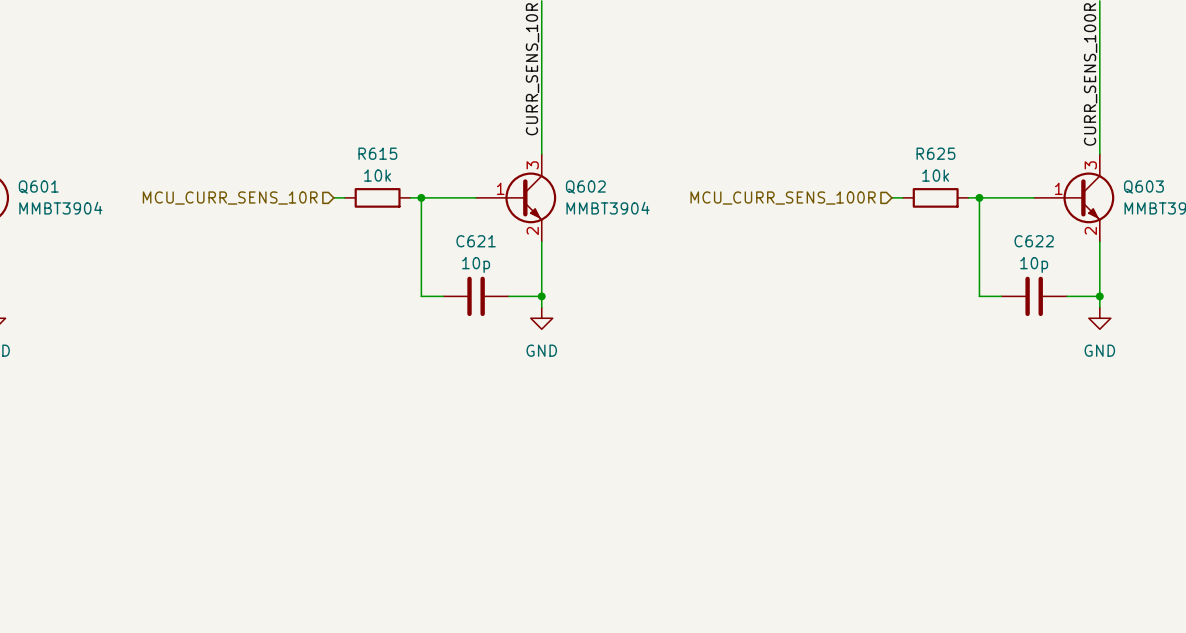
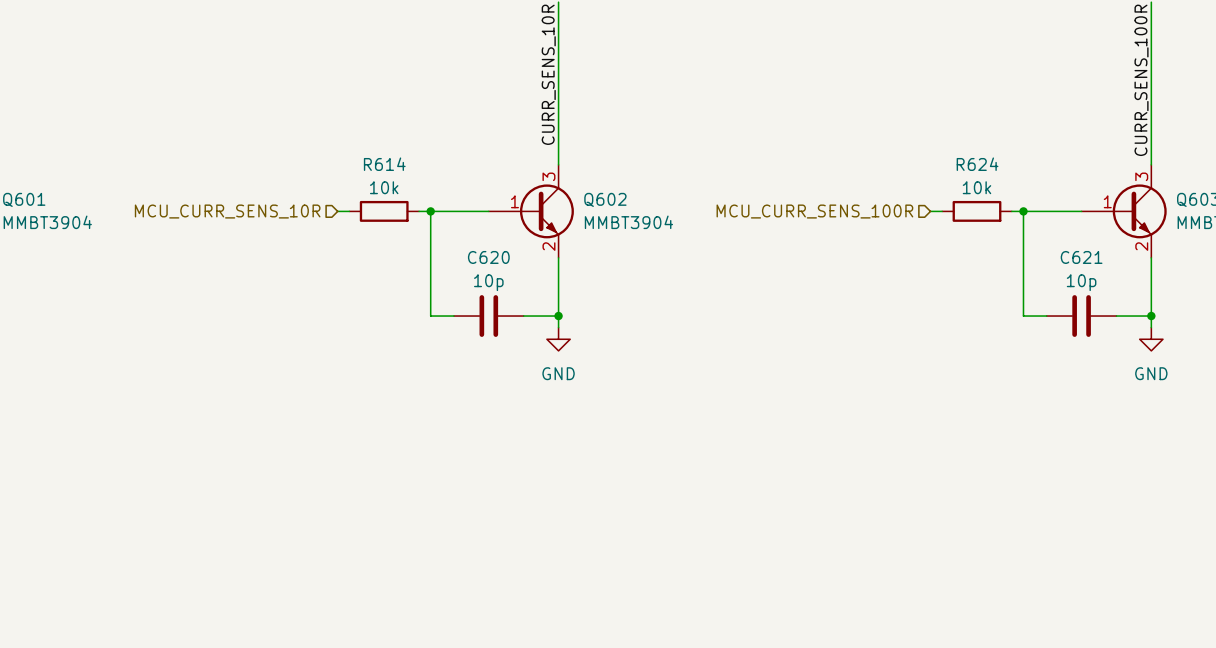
R615 name: R615 (377, 153) -> R614 (384, 164)
R625 name: R625 (935, 153) -> R624 (977, 164)
C621 name: C621 (476, 241) -> C620 (488, 257)
C622 name: C622 (1034, 241) -> C621 (1081, 257)

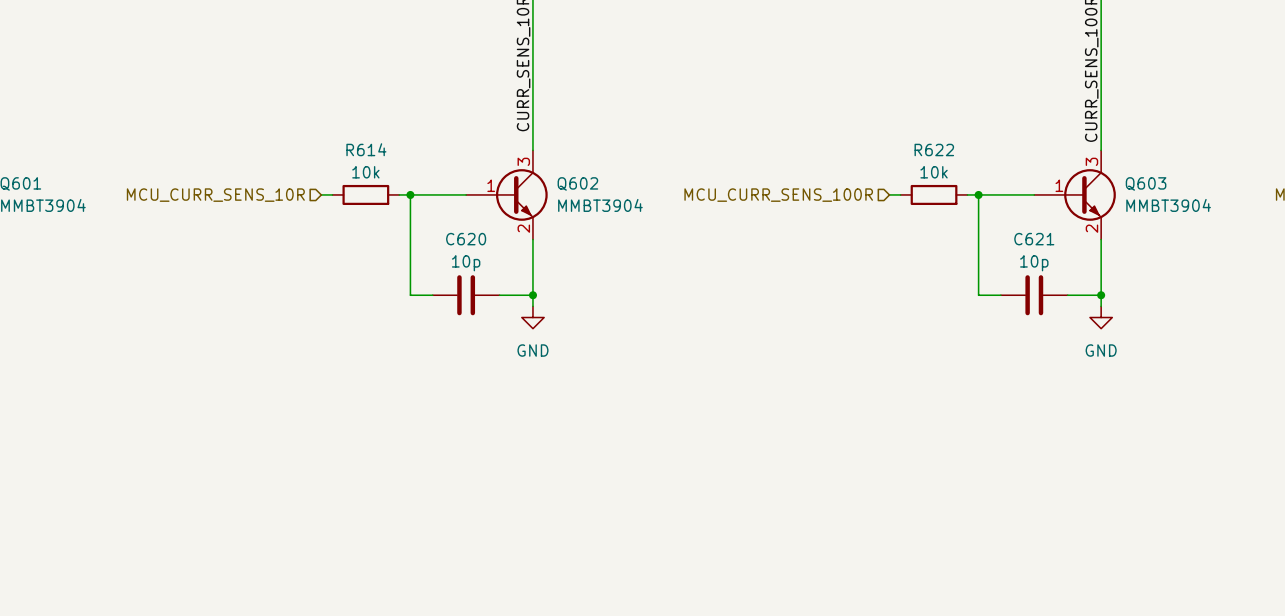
R624 name: R624 (977, 164) -> R622 (934, 149)

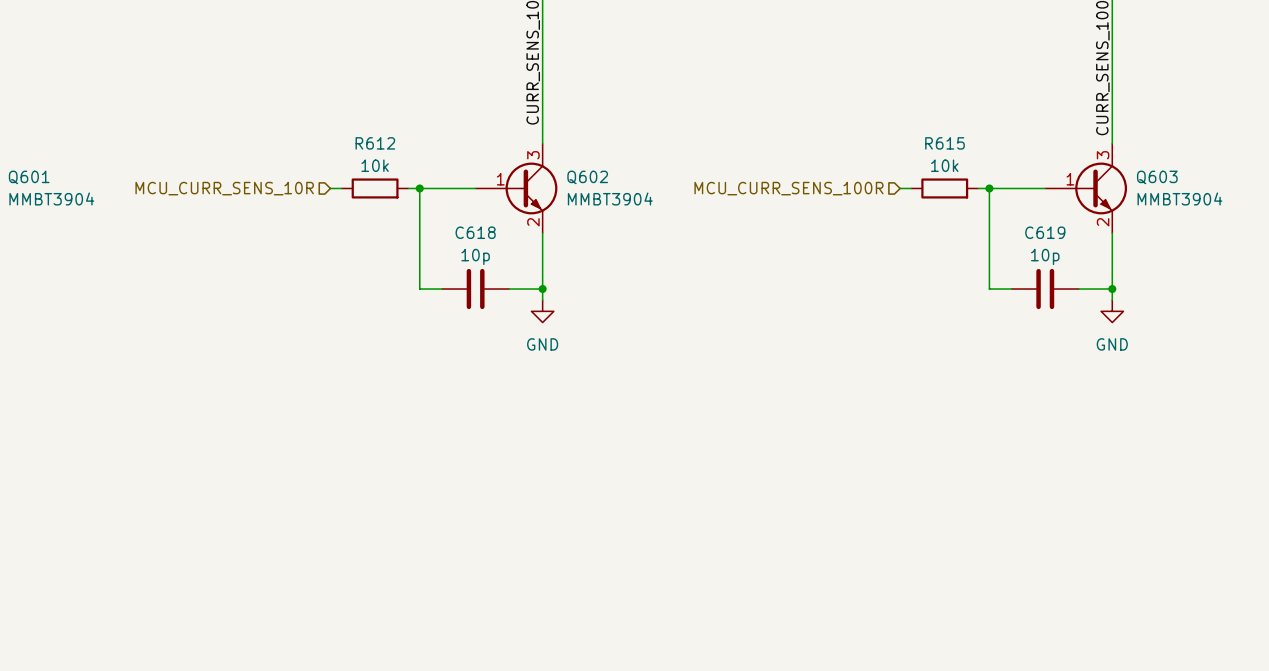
R614 name: R614 (366, 149) -> R612 (375, 143)
R622 name: R622 (934, 149) -> R615 (945, 143)
C620 name: C620 (466, 239) -> C618 (475, 232)
C621 name: C621 (1034, 239) -> C619 (1045, 232)

